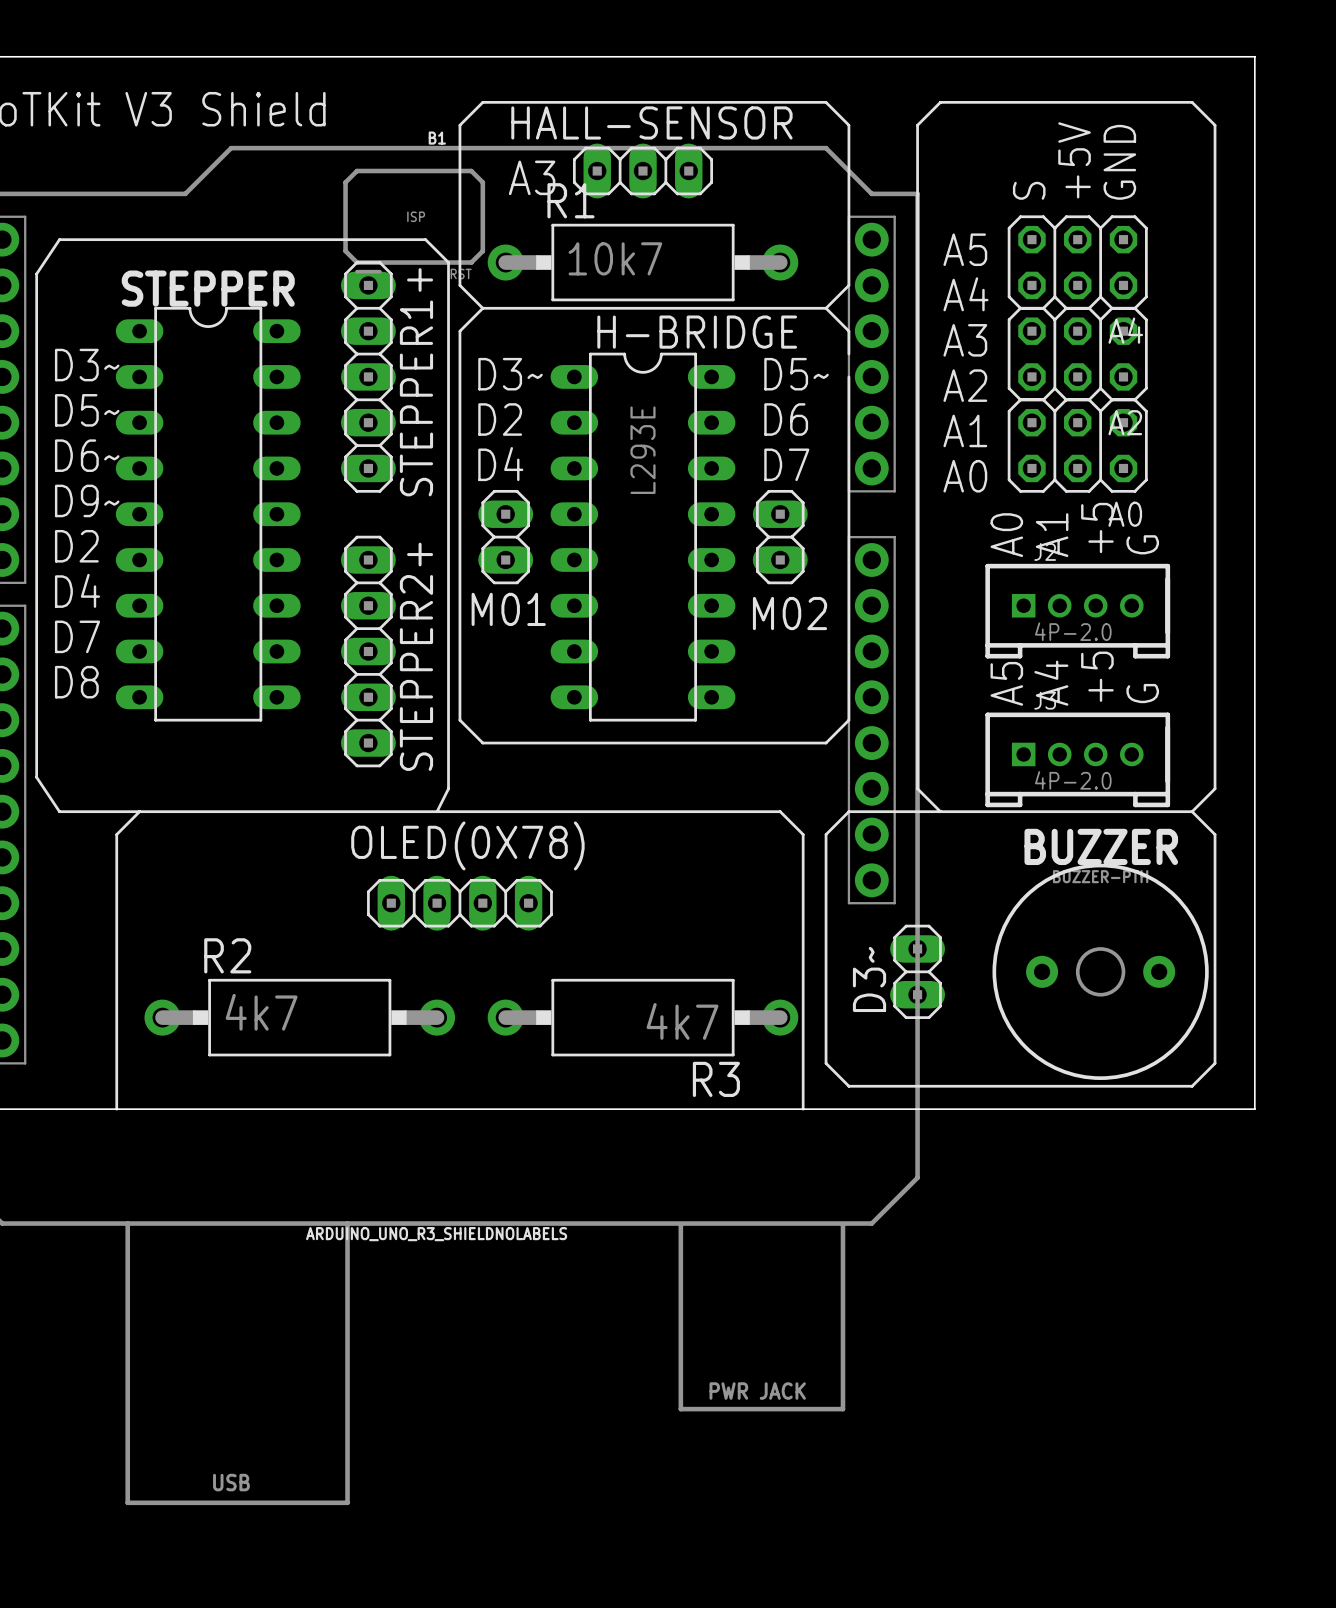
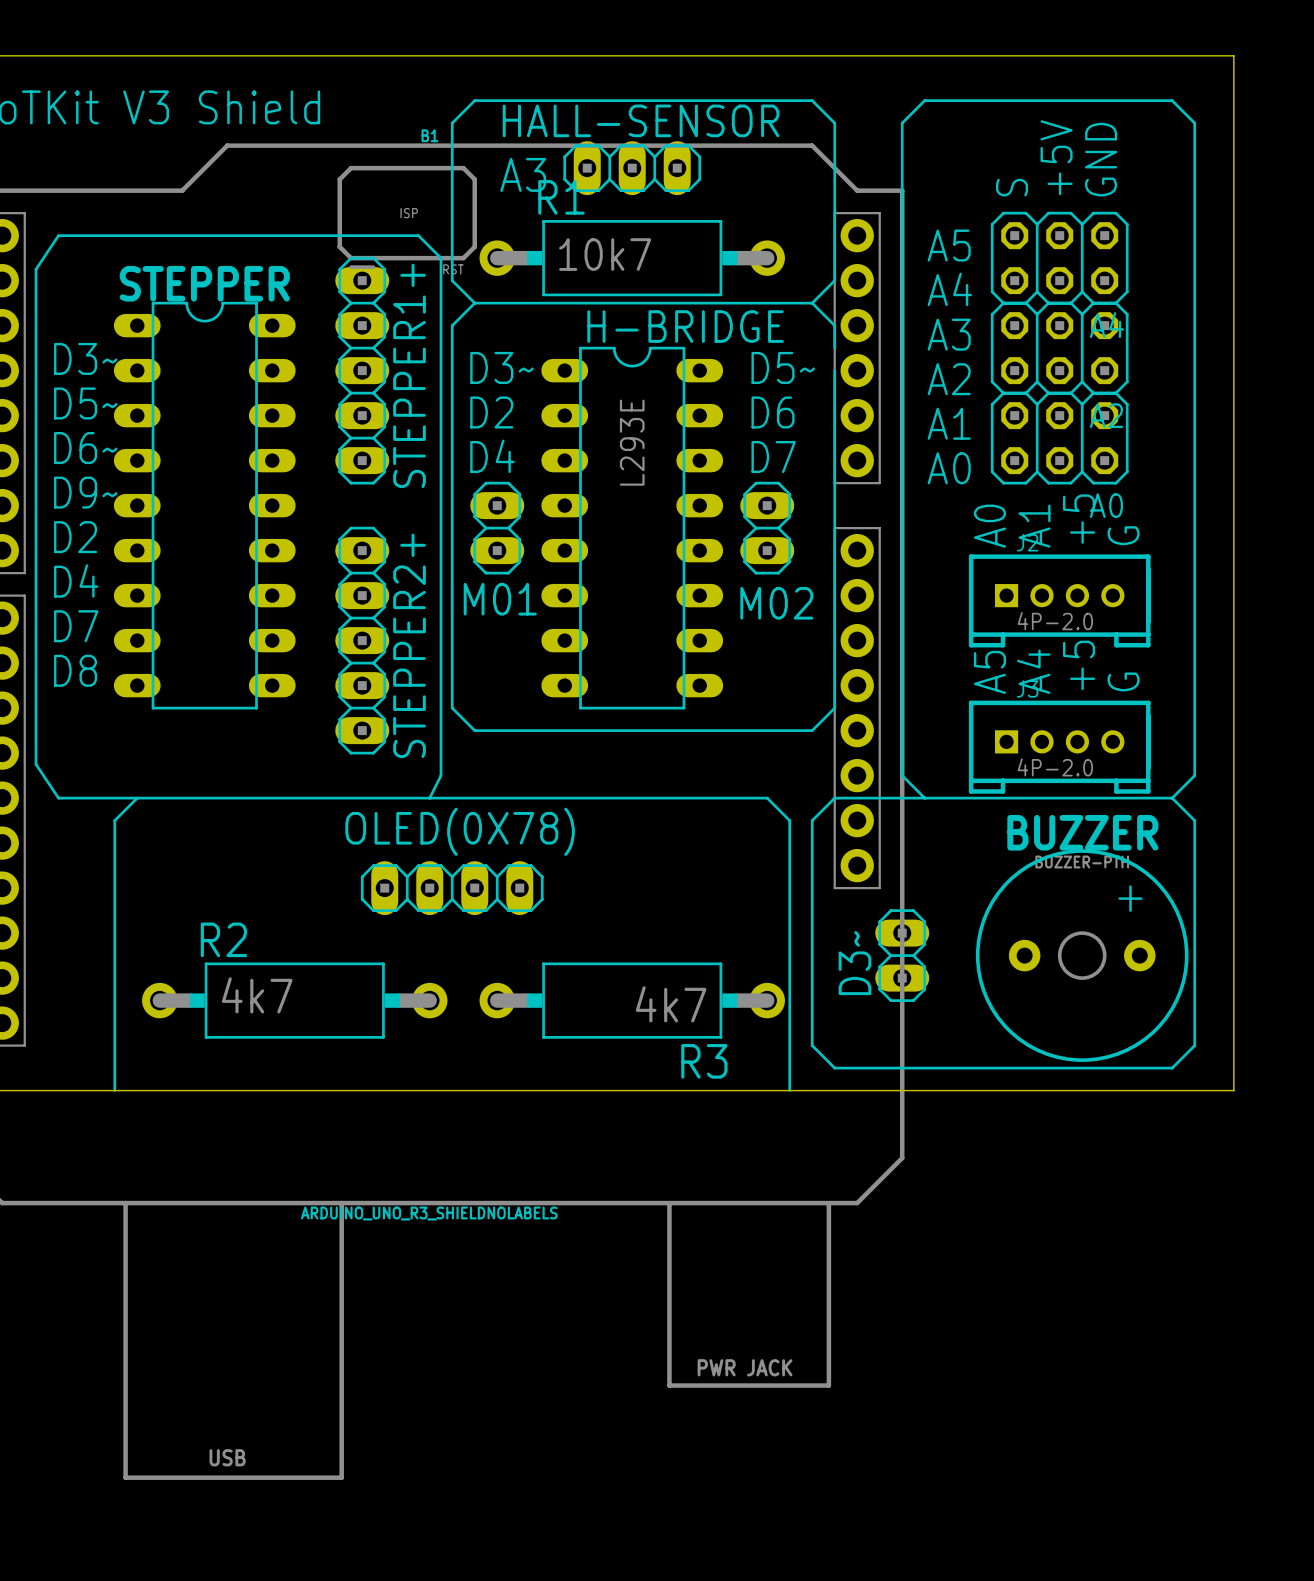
text: none -> + (1130, 898)

